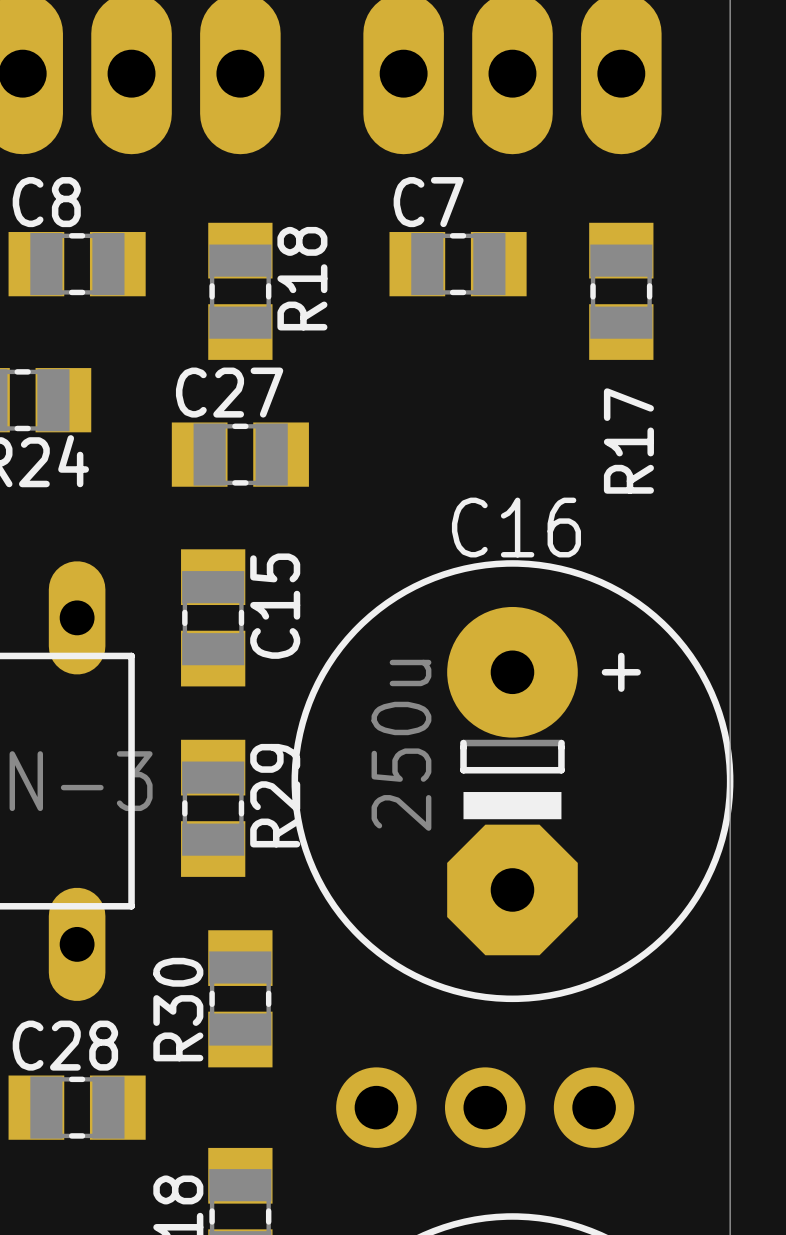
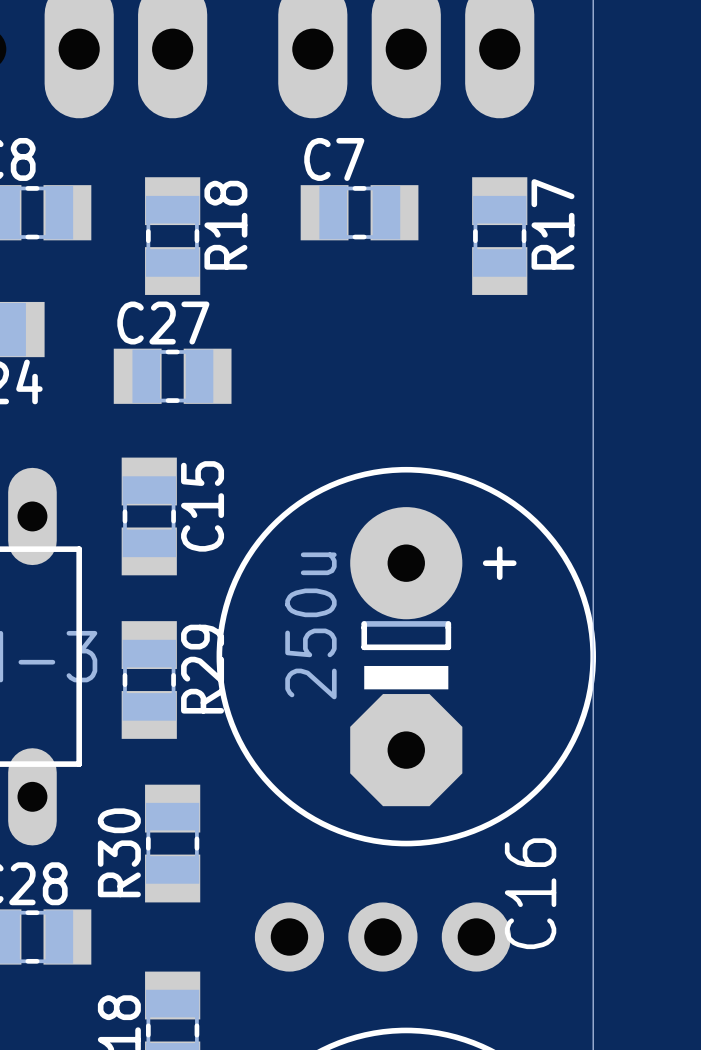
R17 name position: R17 (628, 441) -> R17 (553, 224)
C16 name rotation: 0° (516, 527) -> 90° counterclockwise (530, 893)
C16 name position: C16 (516, 527) -> C16 (530, 893)

